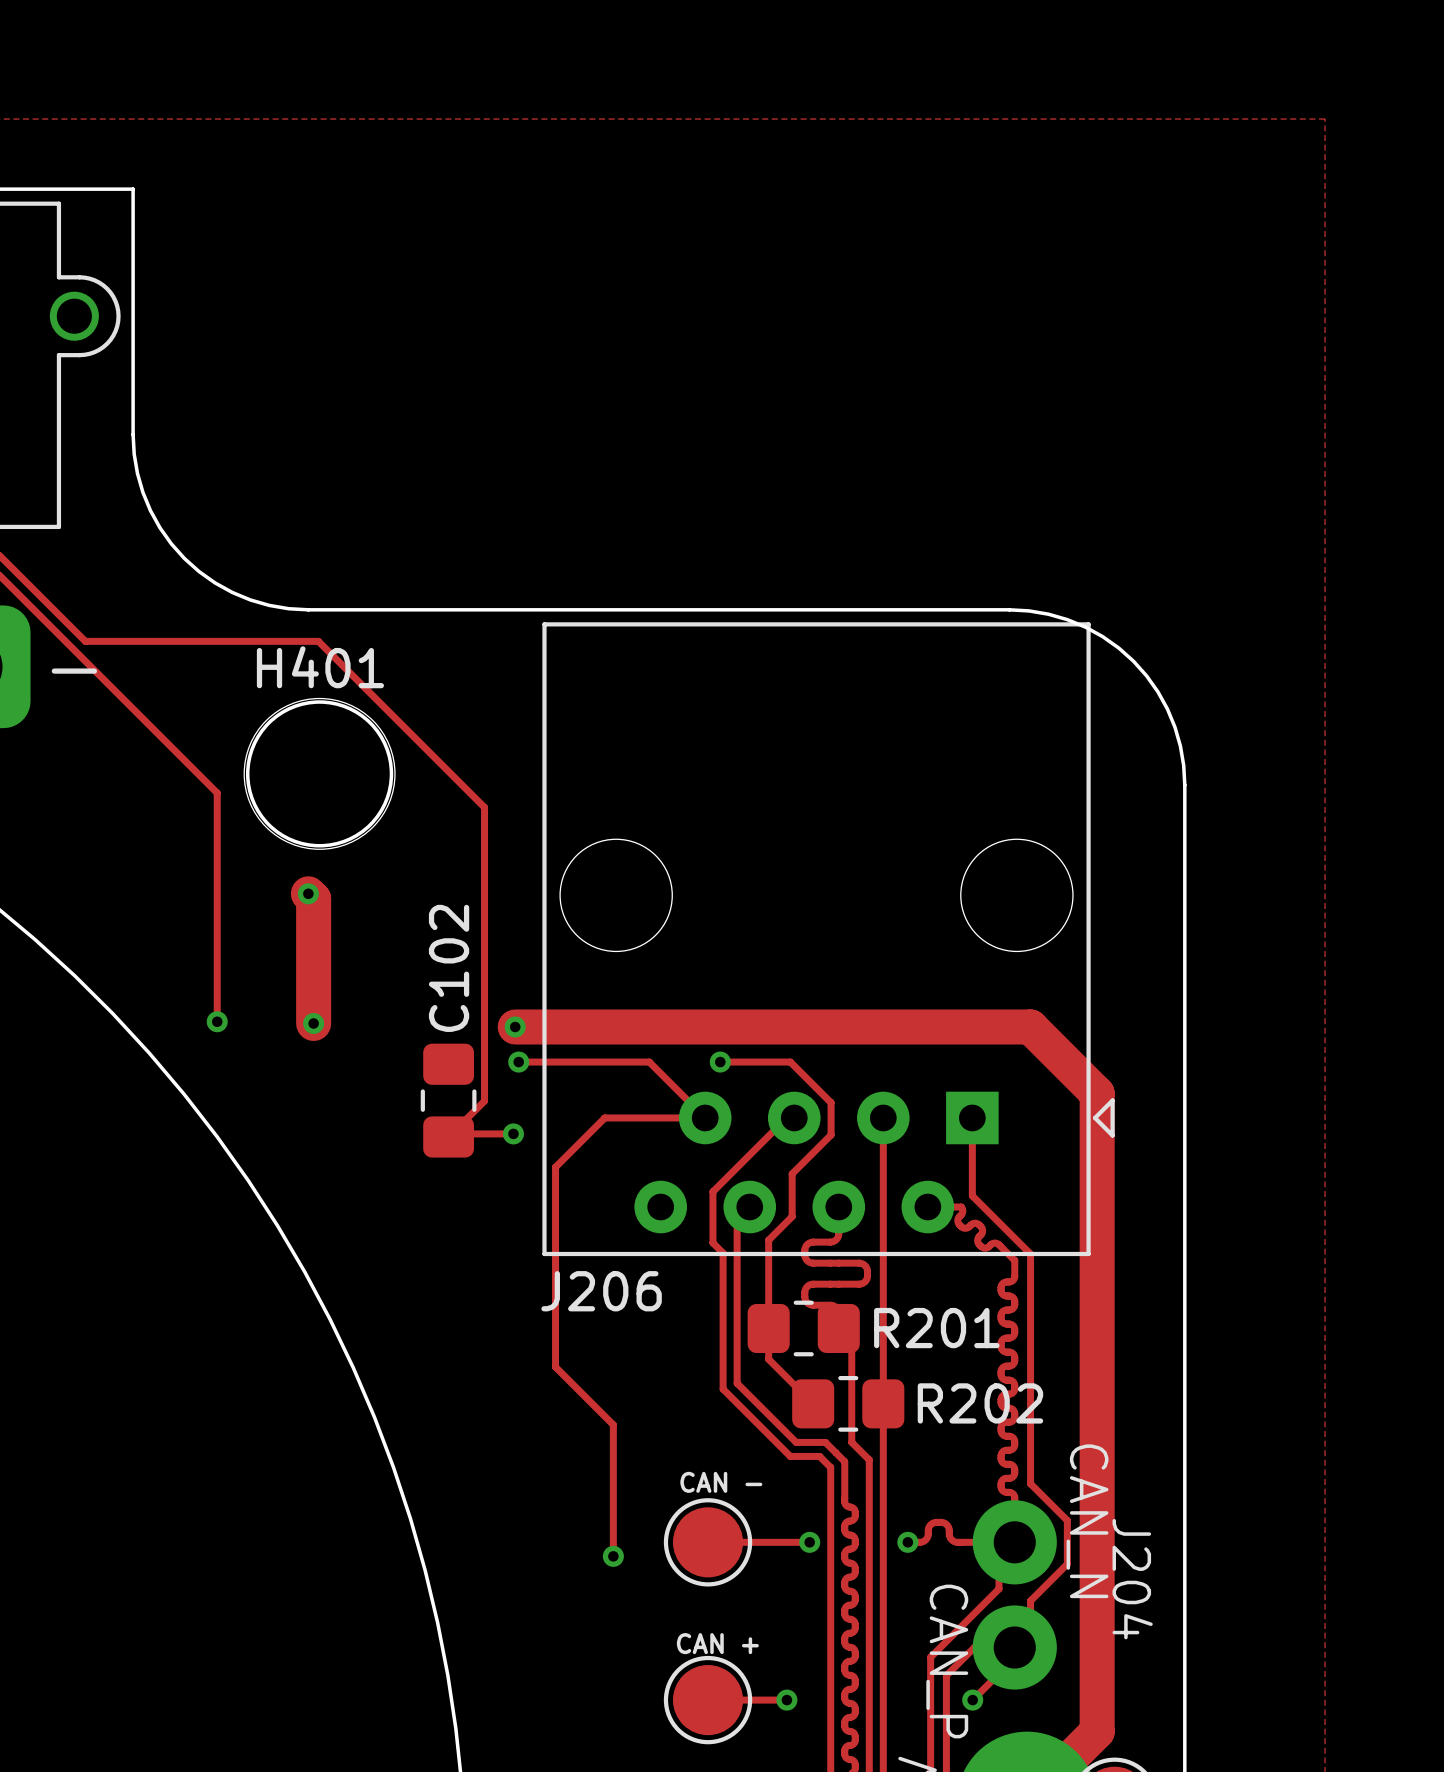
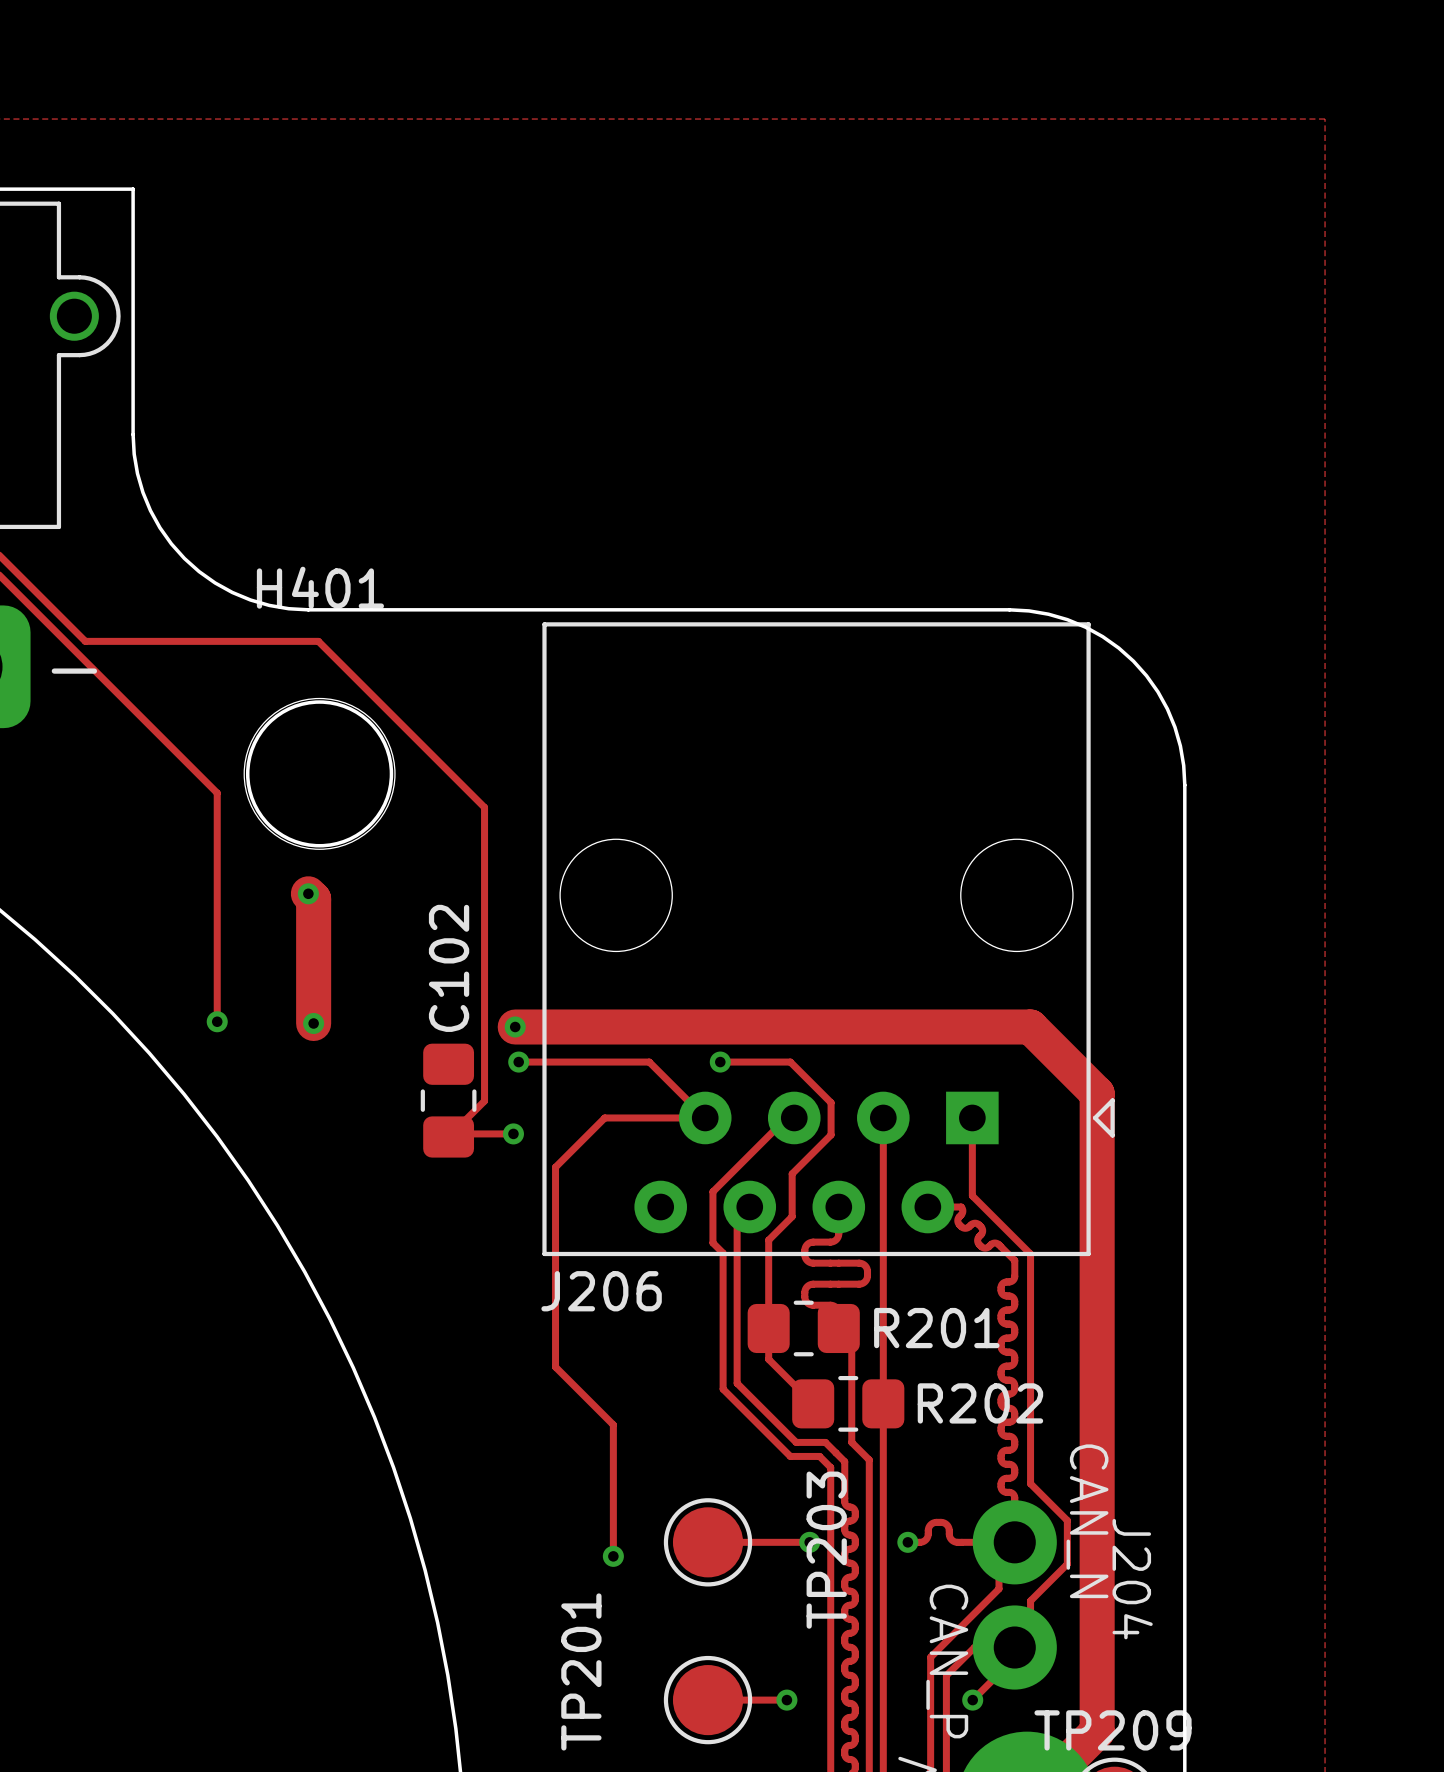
H401 name position: H401 (320, 667) -> H401 (320, 587)
text: CAN - (721, 1482) -> none
TP203 name: none -> TP203 (826, 1550)
text: CAN + (717, 1643) -> none
TP201 name: none -> TP201 (581, 1671)
TP209 name: none -> TP209 (1113, 1730)

